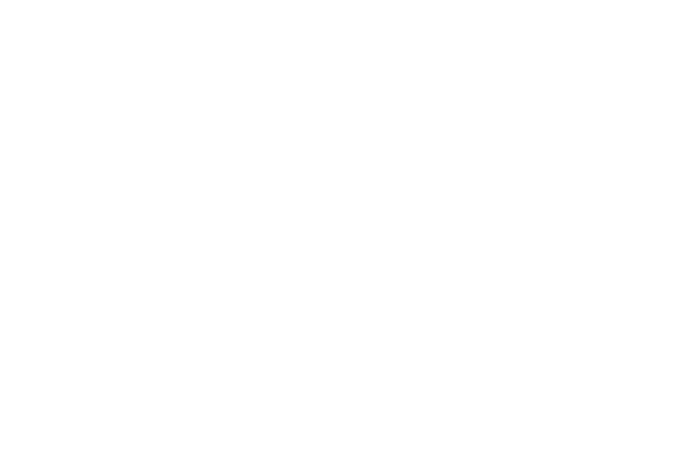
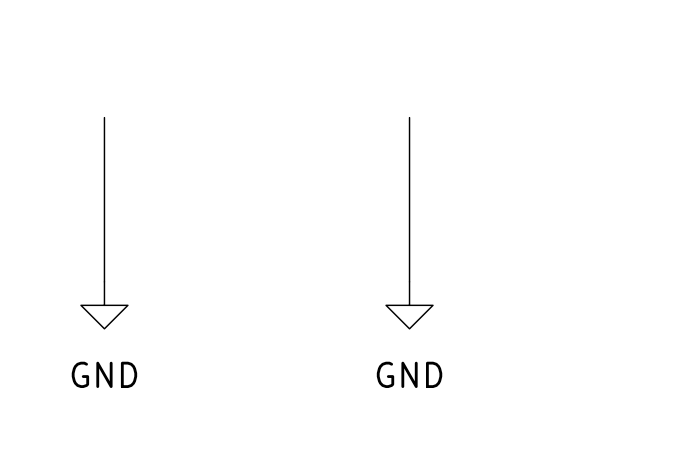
wire: none -> (104, 117) (104, 281)
wire: none -> (409, 117) (409, 281)
power symbol: none -> GND (104, 305)
power symbol: none -> GND (409, 305)

